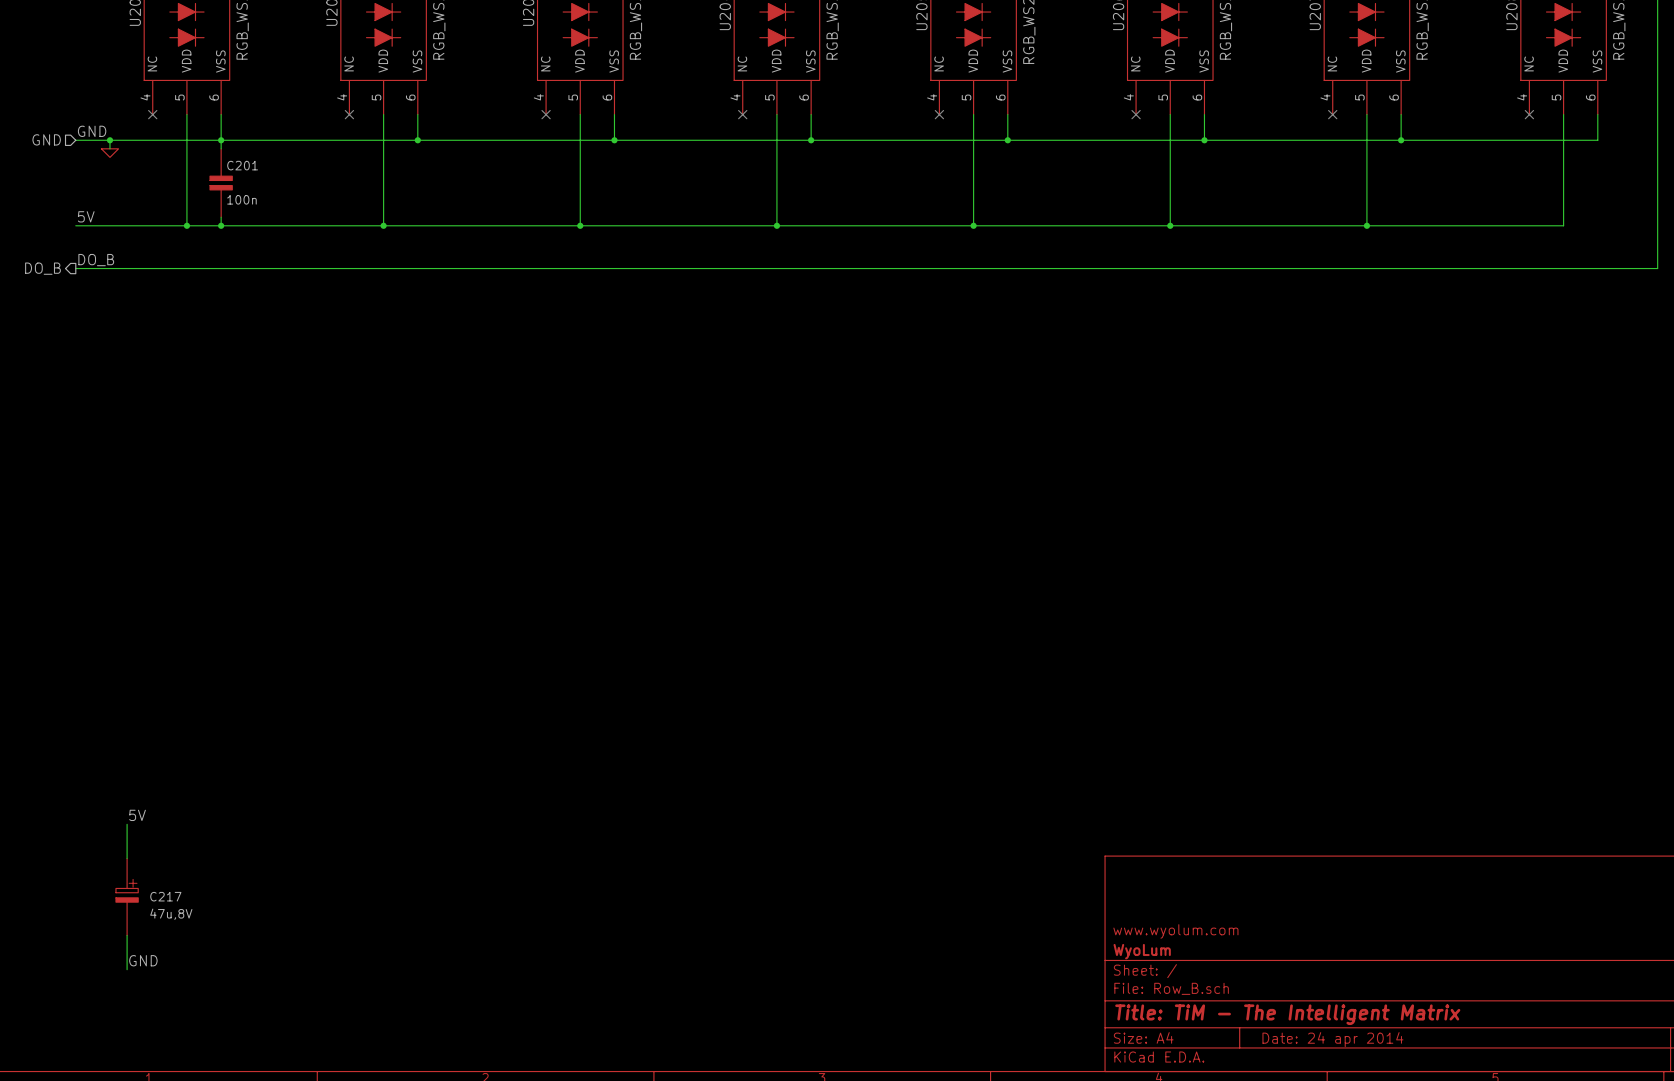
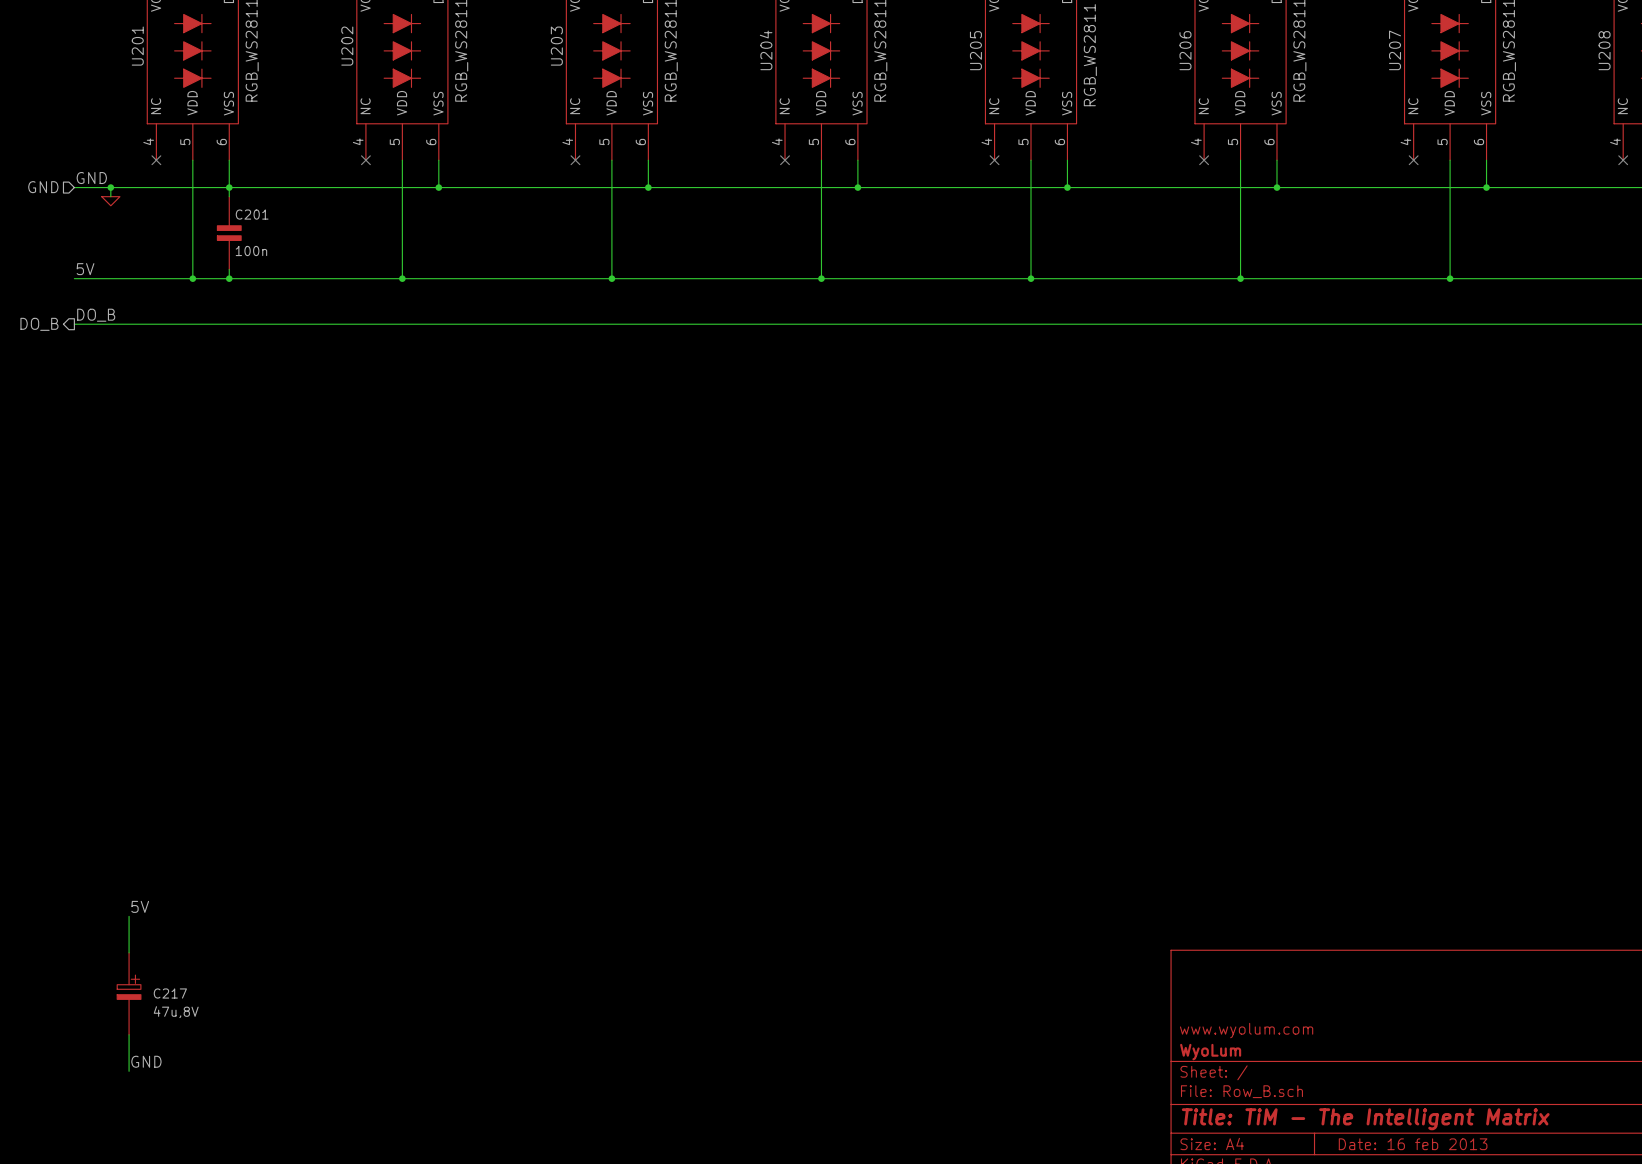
title block: Date: 24 apr 2014 (1332, 1039) -> Date: 16 feb 2013 (1413, 1144)

